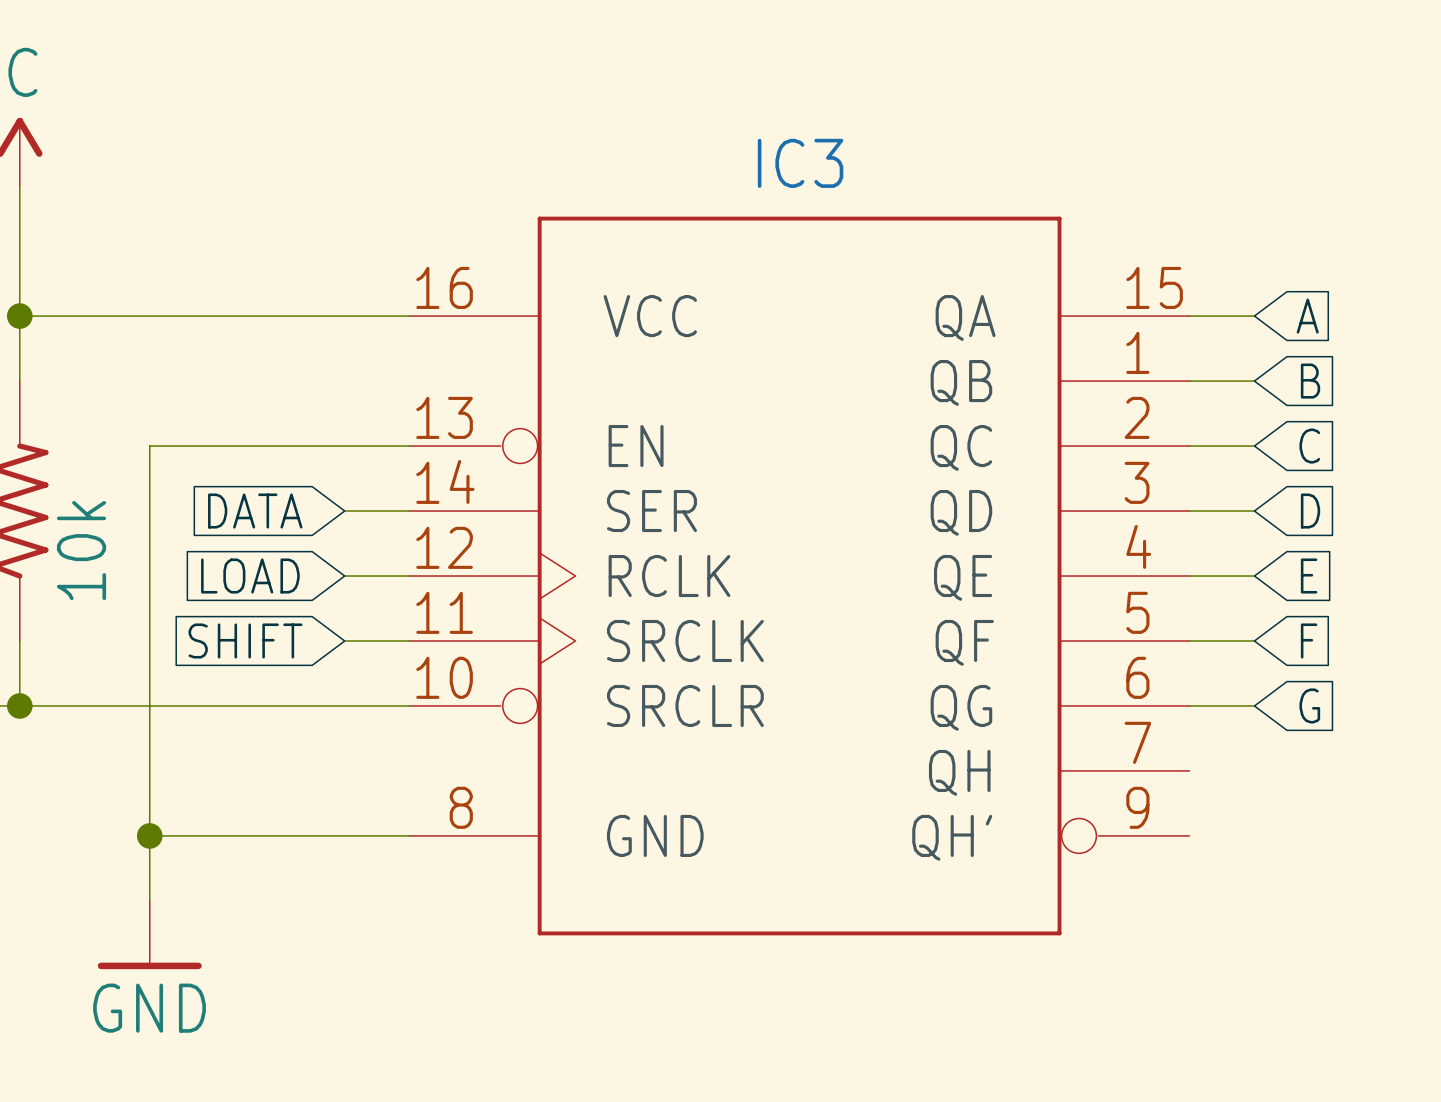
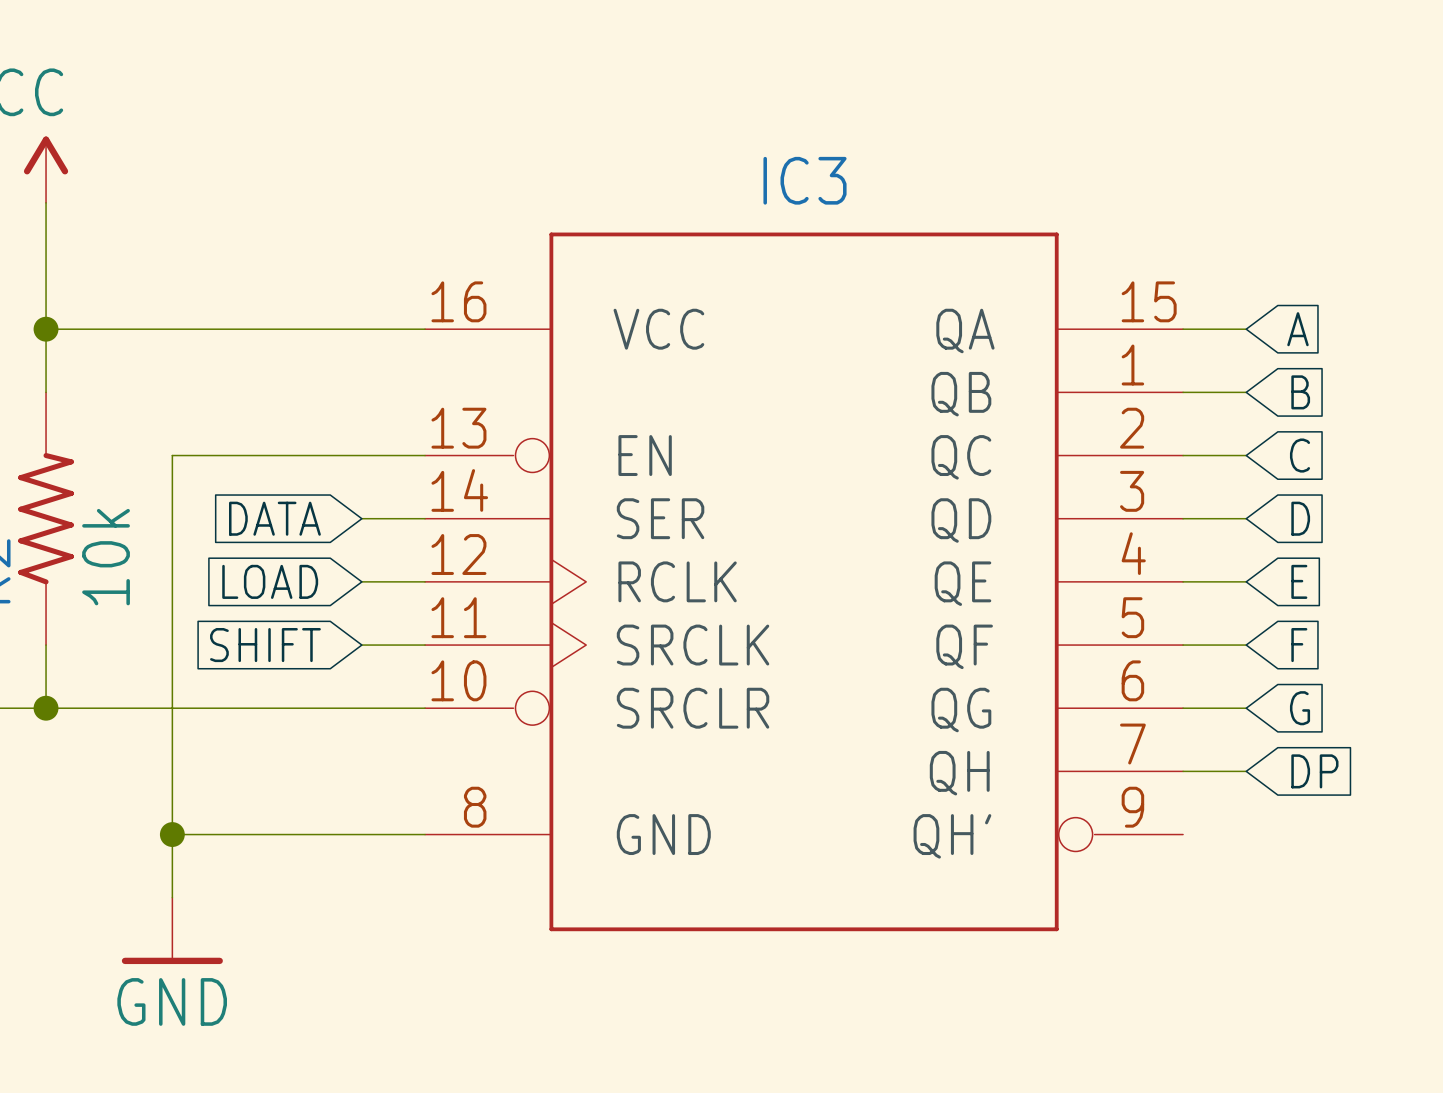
wire: none -> (1183, 771) (1246, 771)
global label: none -> DP (1314, 771)

